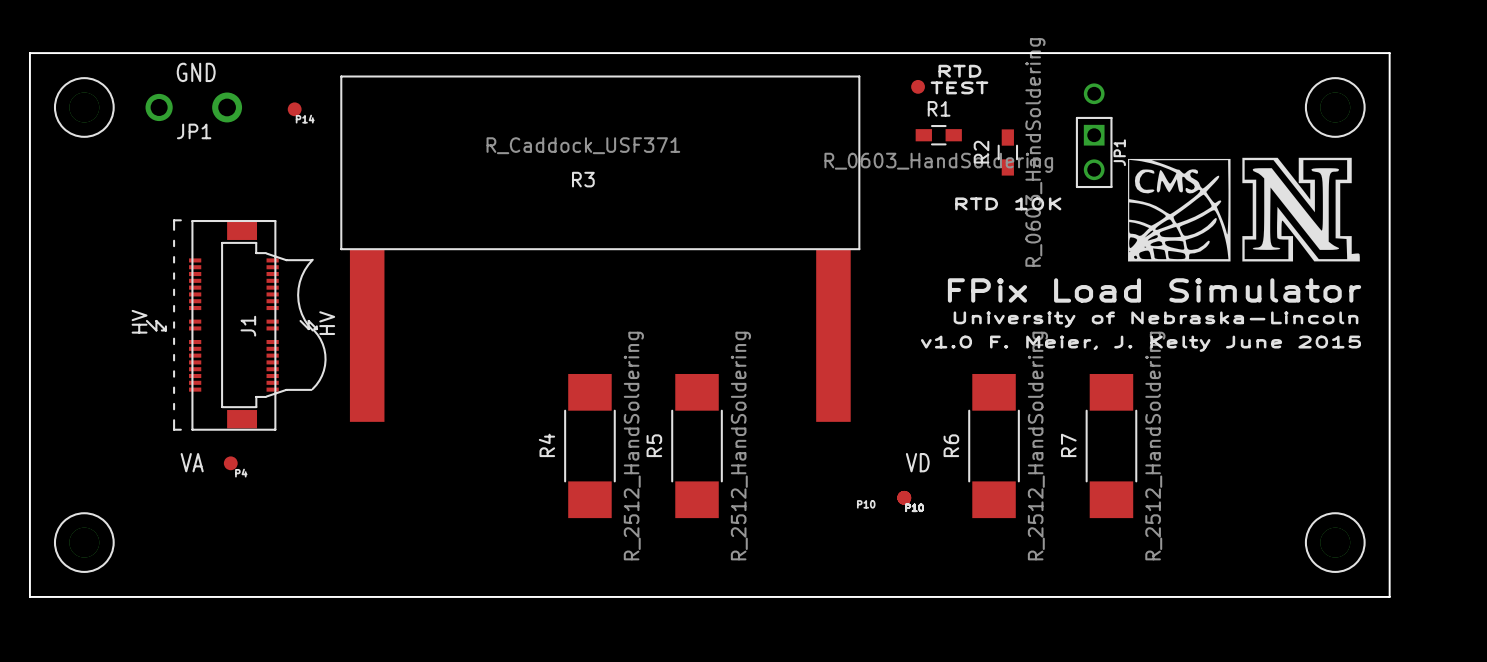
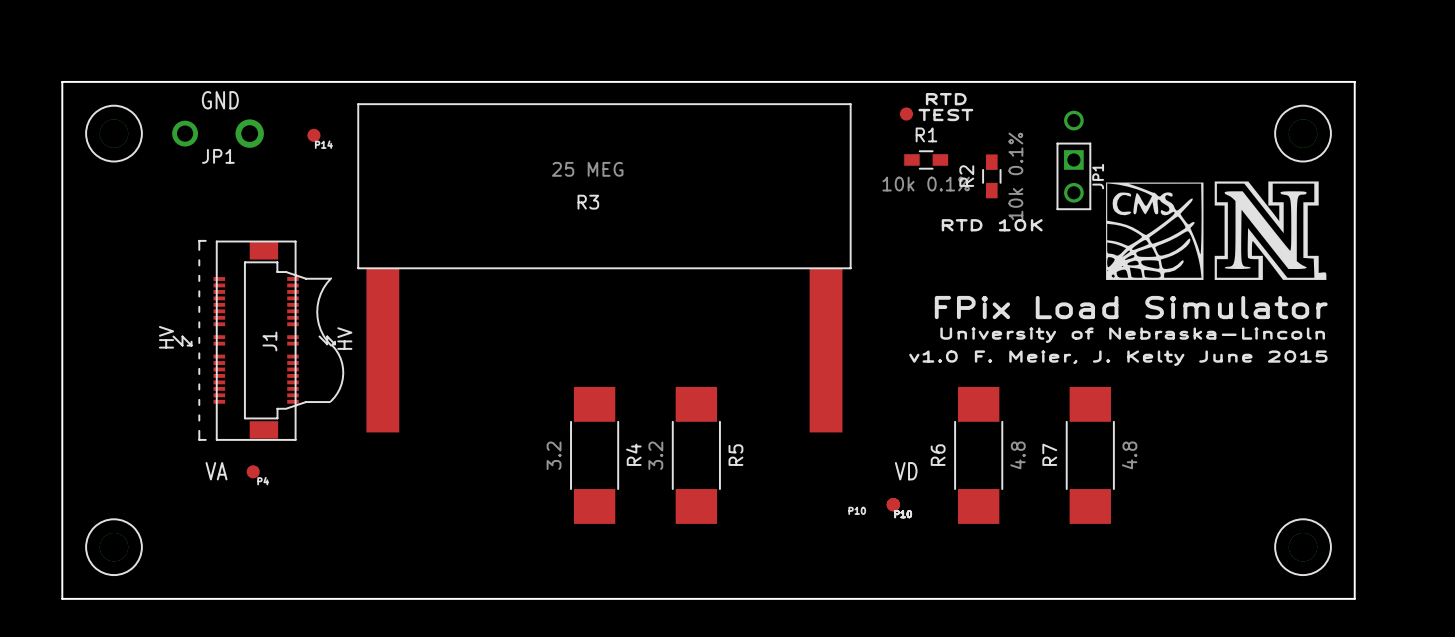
R3 value: R_Caddock_USF371 (583, 145) -> 25 MEG (587, 169)
R2 value: R_0603_HandSoldering (1035, 152) -> 10k 0.1% (1015, 176)
R1 value: R_0603_HandSoldering (938, 162) -> 10k 0.1% (926, 184)
R4 name position: R4 (546, 445) -> R4 (633, 454)
R5 name position: R5 (654, 445) -> R5 (735, 455)
R4 value: R_2512_HandSoldering (633, 446) -> 3.2 (554, 455)
R5 value: R_2512_HandSoldering (740, 446) -> 3.2 (655, 455)
R6 value: R_2512_HandSoldering (1037, 446) -> 4.8 (1017, 455)
R7 value: R_2512_HandSoldering (1155, 446) -> 4.8 (1129, 455)

